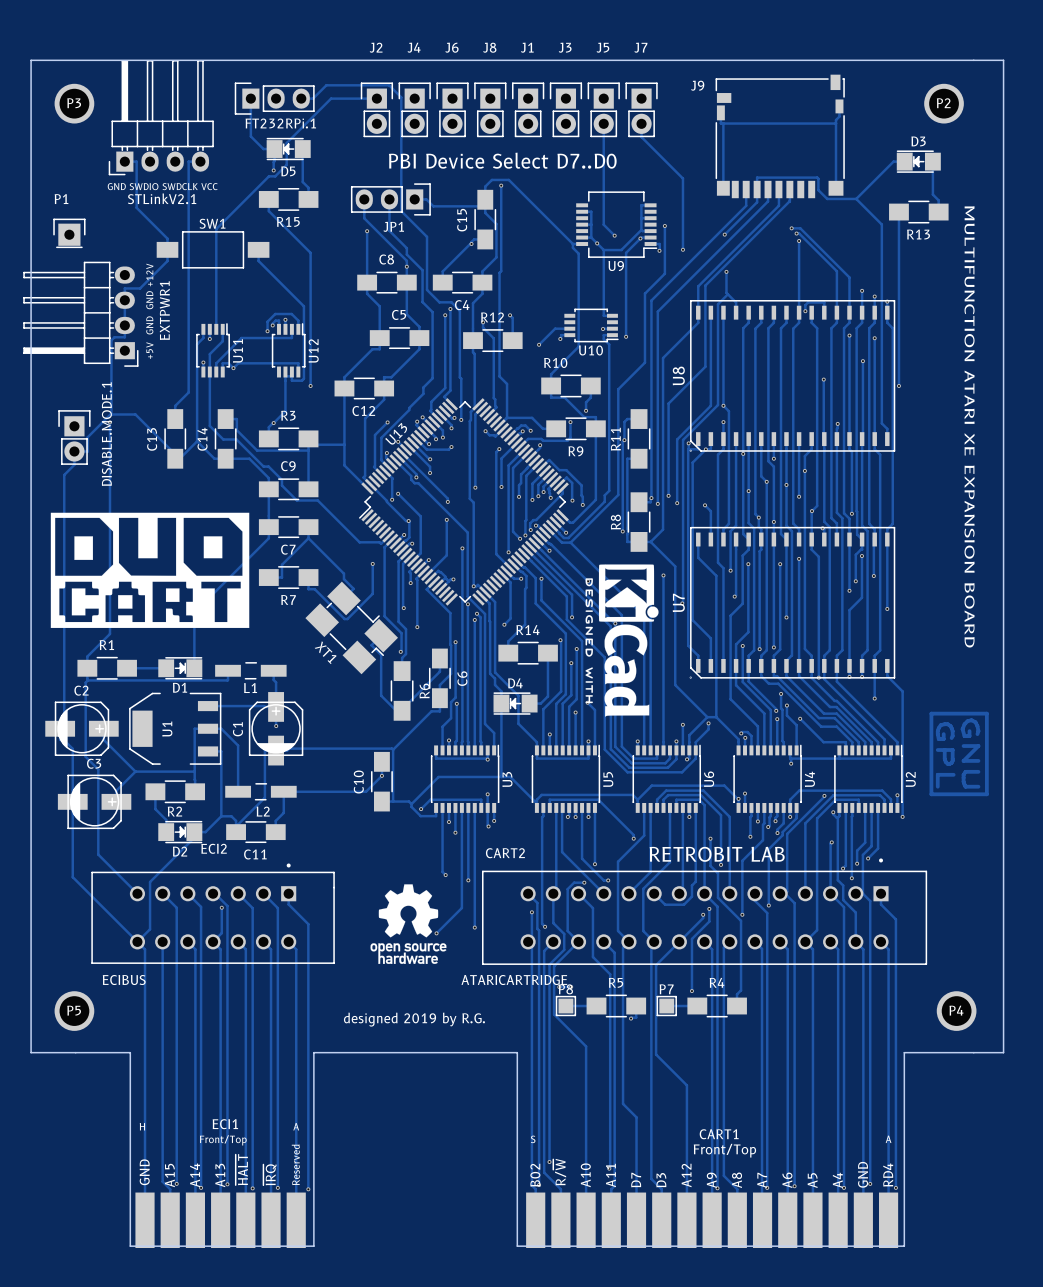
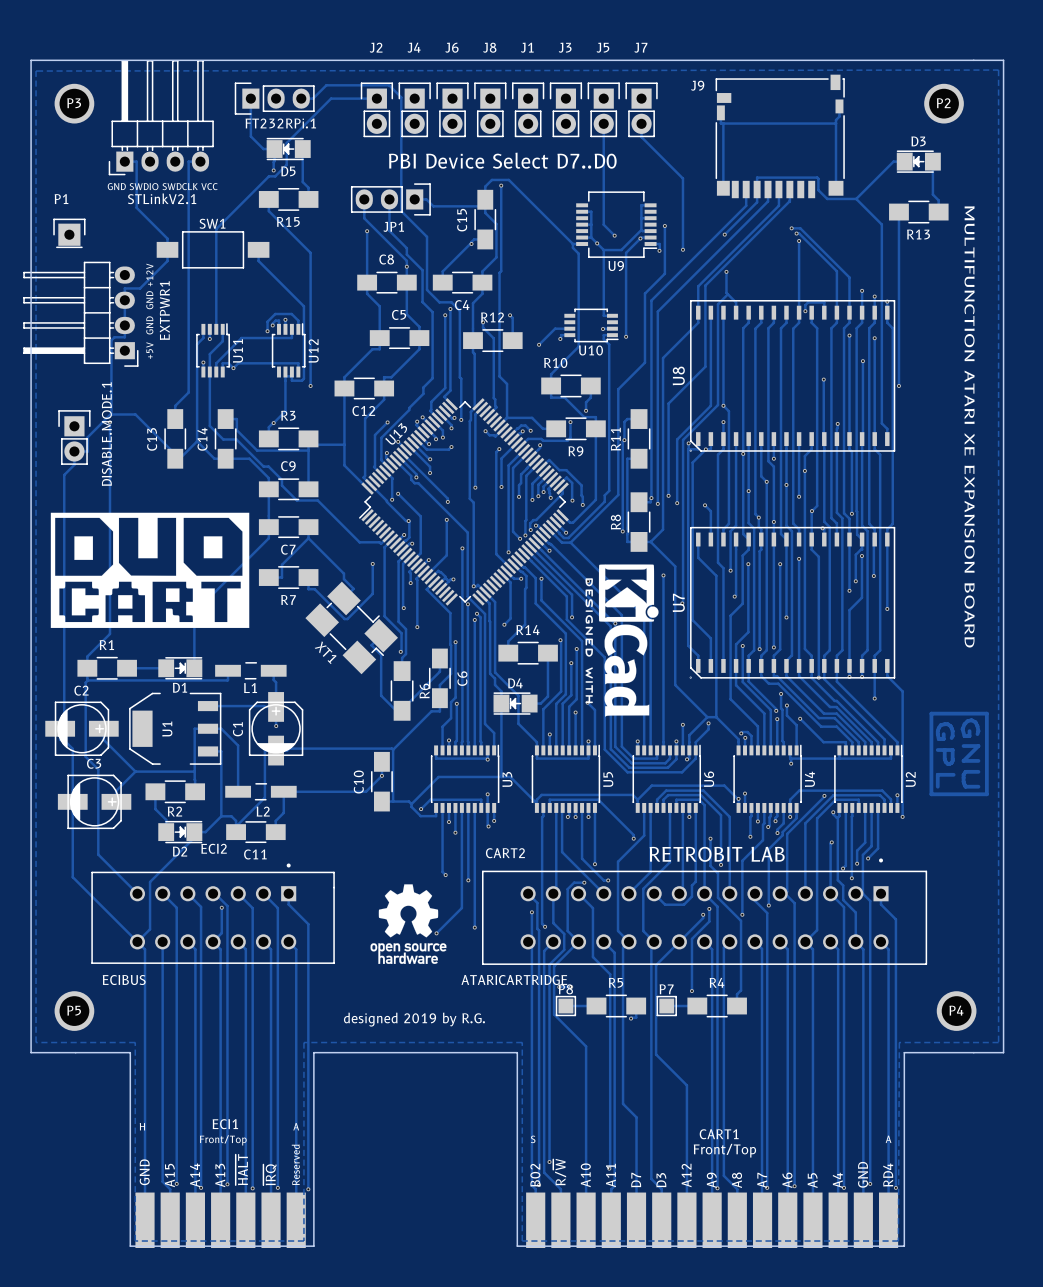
zone outline: none -> (998, 70) (36, 71) (36, 1042) (135, 1042) (135, 1241) (303, 1241) (303, 1042) (522, 1042) (522, 1241) (898, 1241) (899, 1042) (998, 1042) (998, 70)

